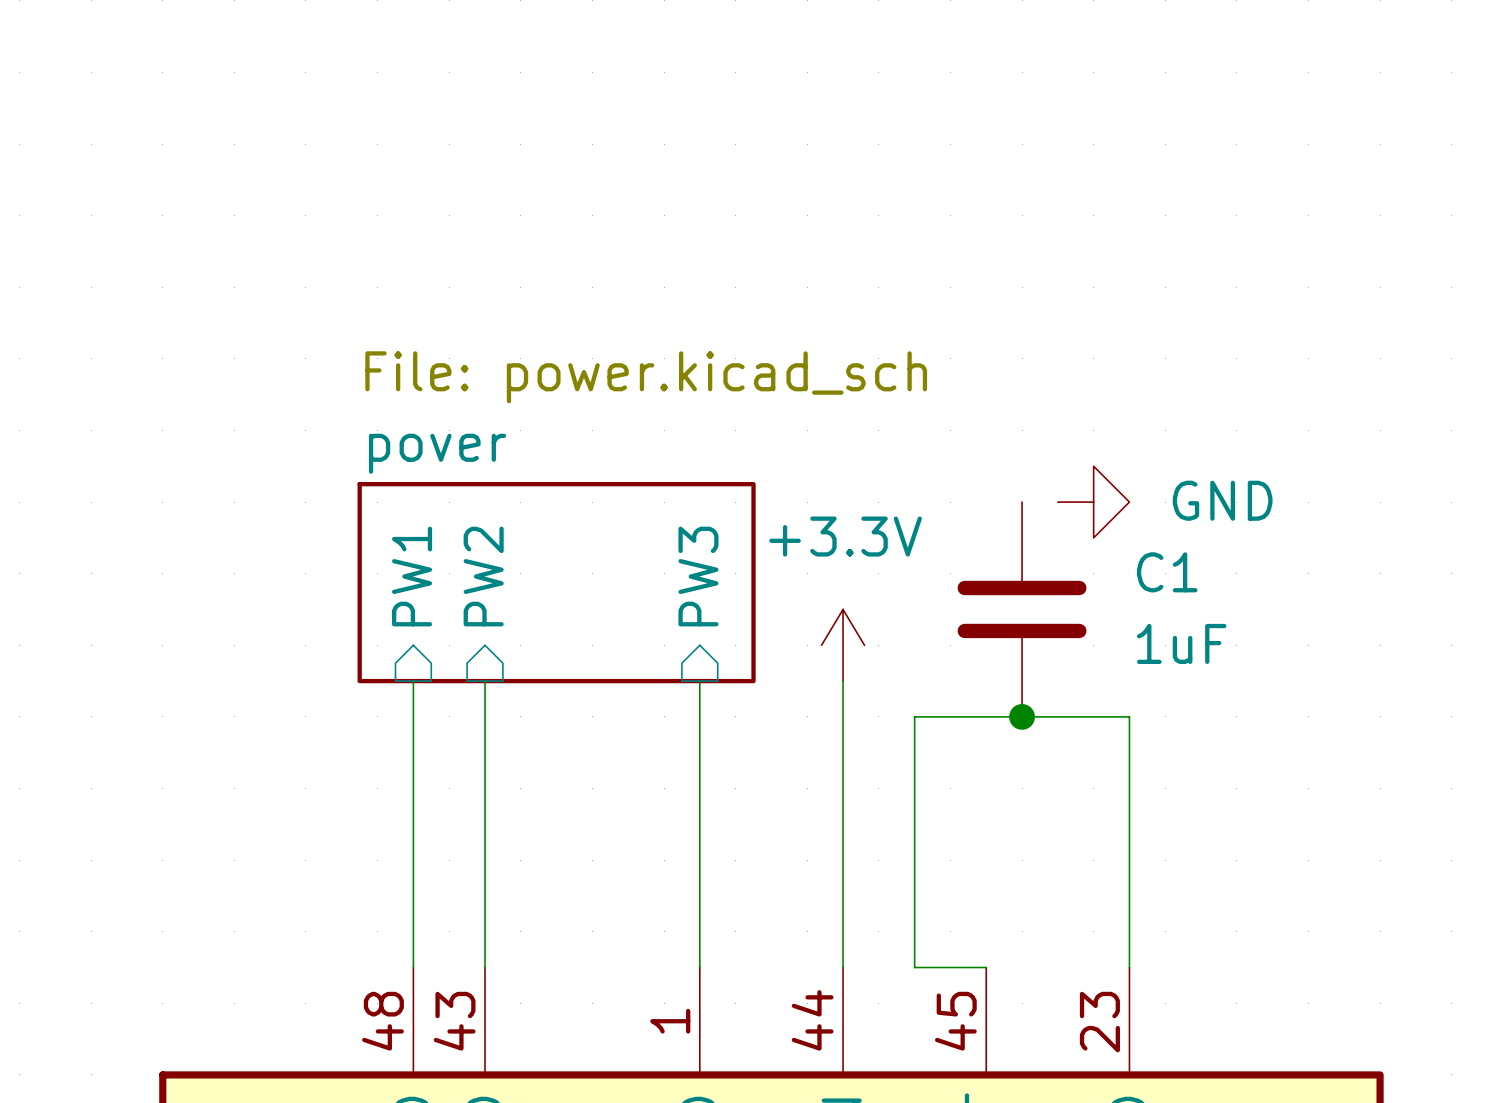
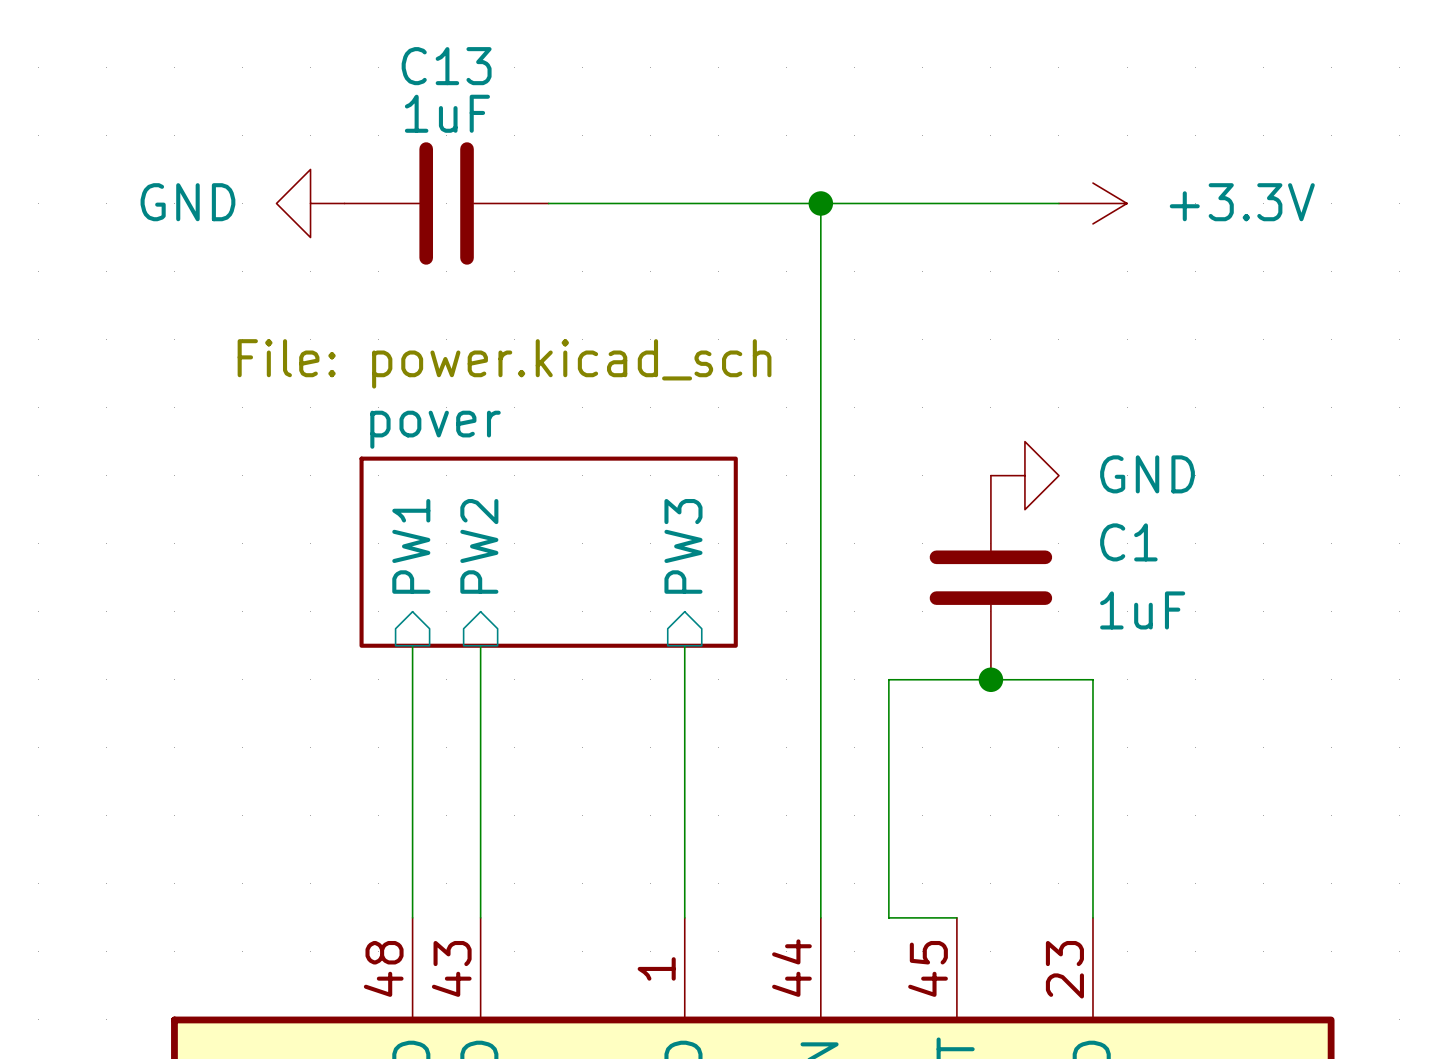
power symbol: none -> GND (310, 203)
C13: none -> 1uF (446, 203)
wire: none -> (548, 203) (1058, 203)
wire: none -> (820, 203) (820, 645)
junction: none -> (820, 203)
sheet pover value position: File: power.kicad_sch (646, 377) -> File: power.kicad_sch (504, 363)
power symbol position: GND (1093, 502) -> GND (1024, 475)
power symbol text position: +3.3V (845, 536) -> +3.3V (1242, 202)
power symbol rotation: 0° (843, 645) -> 90° clockwise (1092, 203)
power symbol position: +3.3V (843, 645) -> +3.3V (1092, 203)

